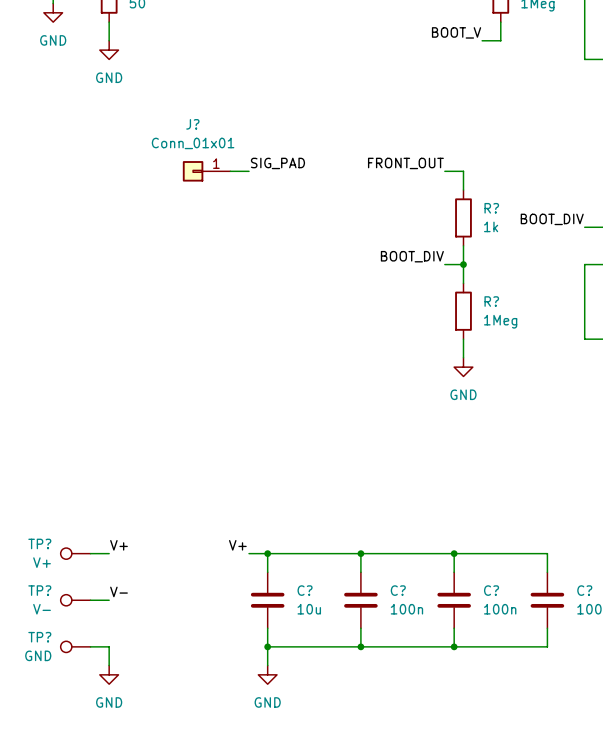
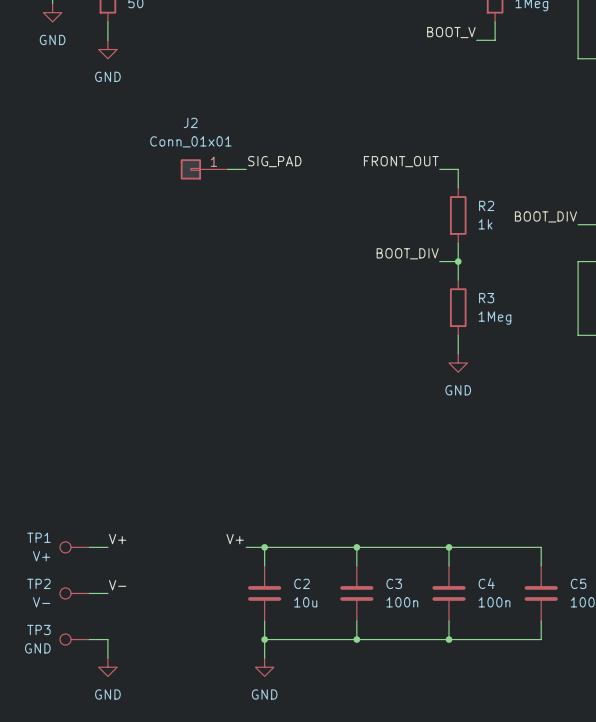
J? name: J? (192, 124) -> J2 (190, 122)
R? name: R? (491, 208) -> R2 (486, 205)
R? name: R? (491, 301) -> R3 (486, 298)
TP? name: TP? (39, 543) -> TP1 (38, 537)
TP? name: TP? (39, 590) -> TP2 (38, 583)
C? name: C? (305, 590) -> C2 (302, 583)
C? name: C? (398, 590) -> C3 (394, 583)
C? name: C? (491, 590) -> C4 (486, 583)
C? name: C? (584, 590) -> C5 (578, 583)
TP? name: TP? (39, 637) -> TP3 (38, 629)

